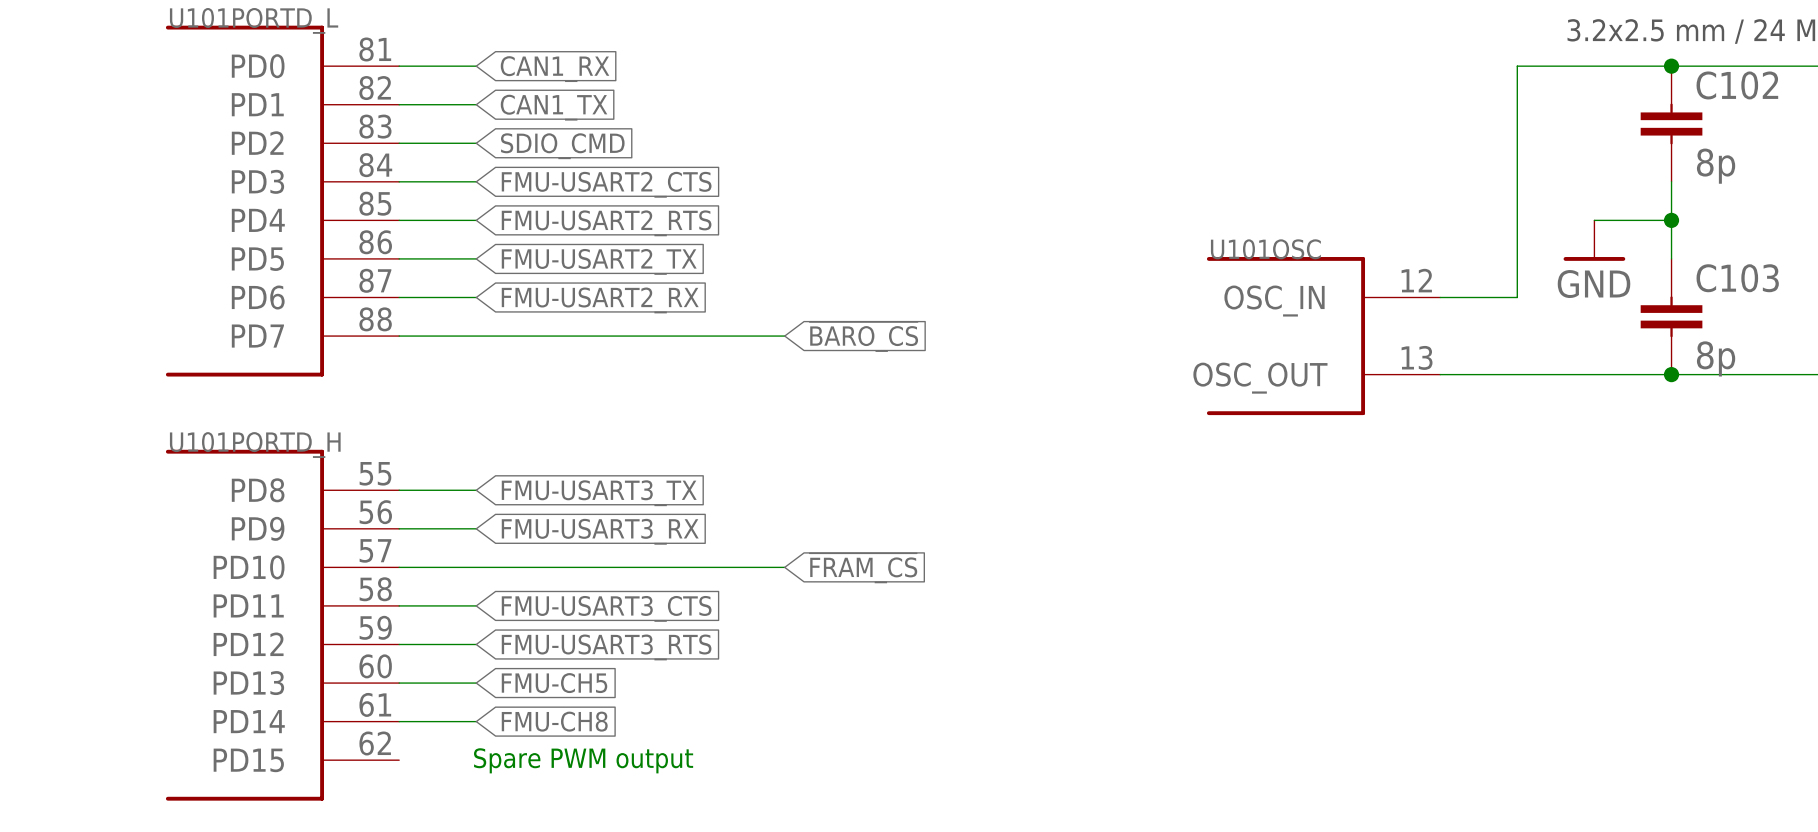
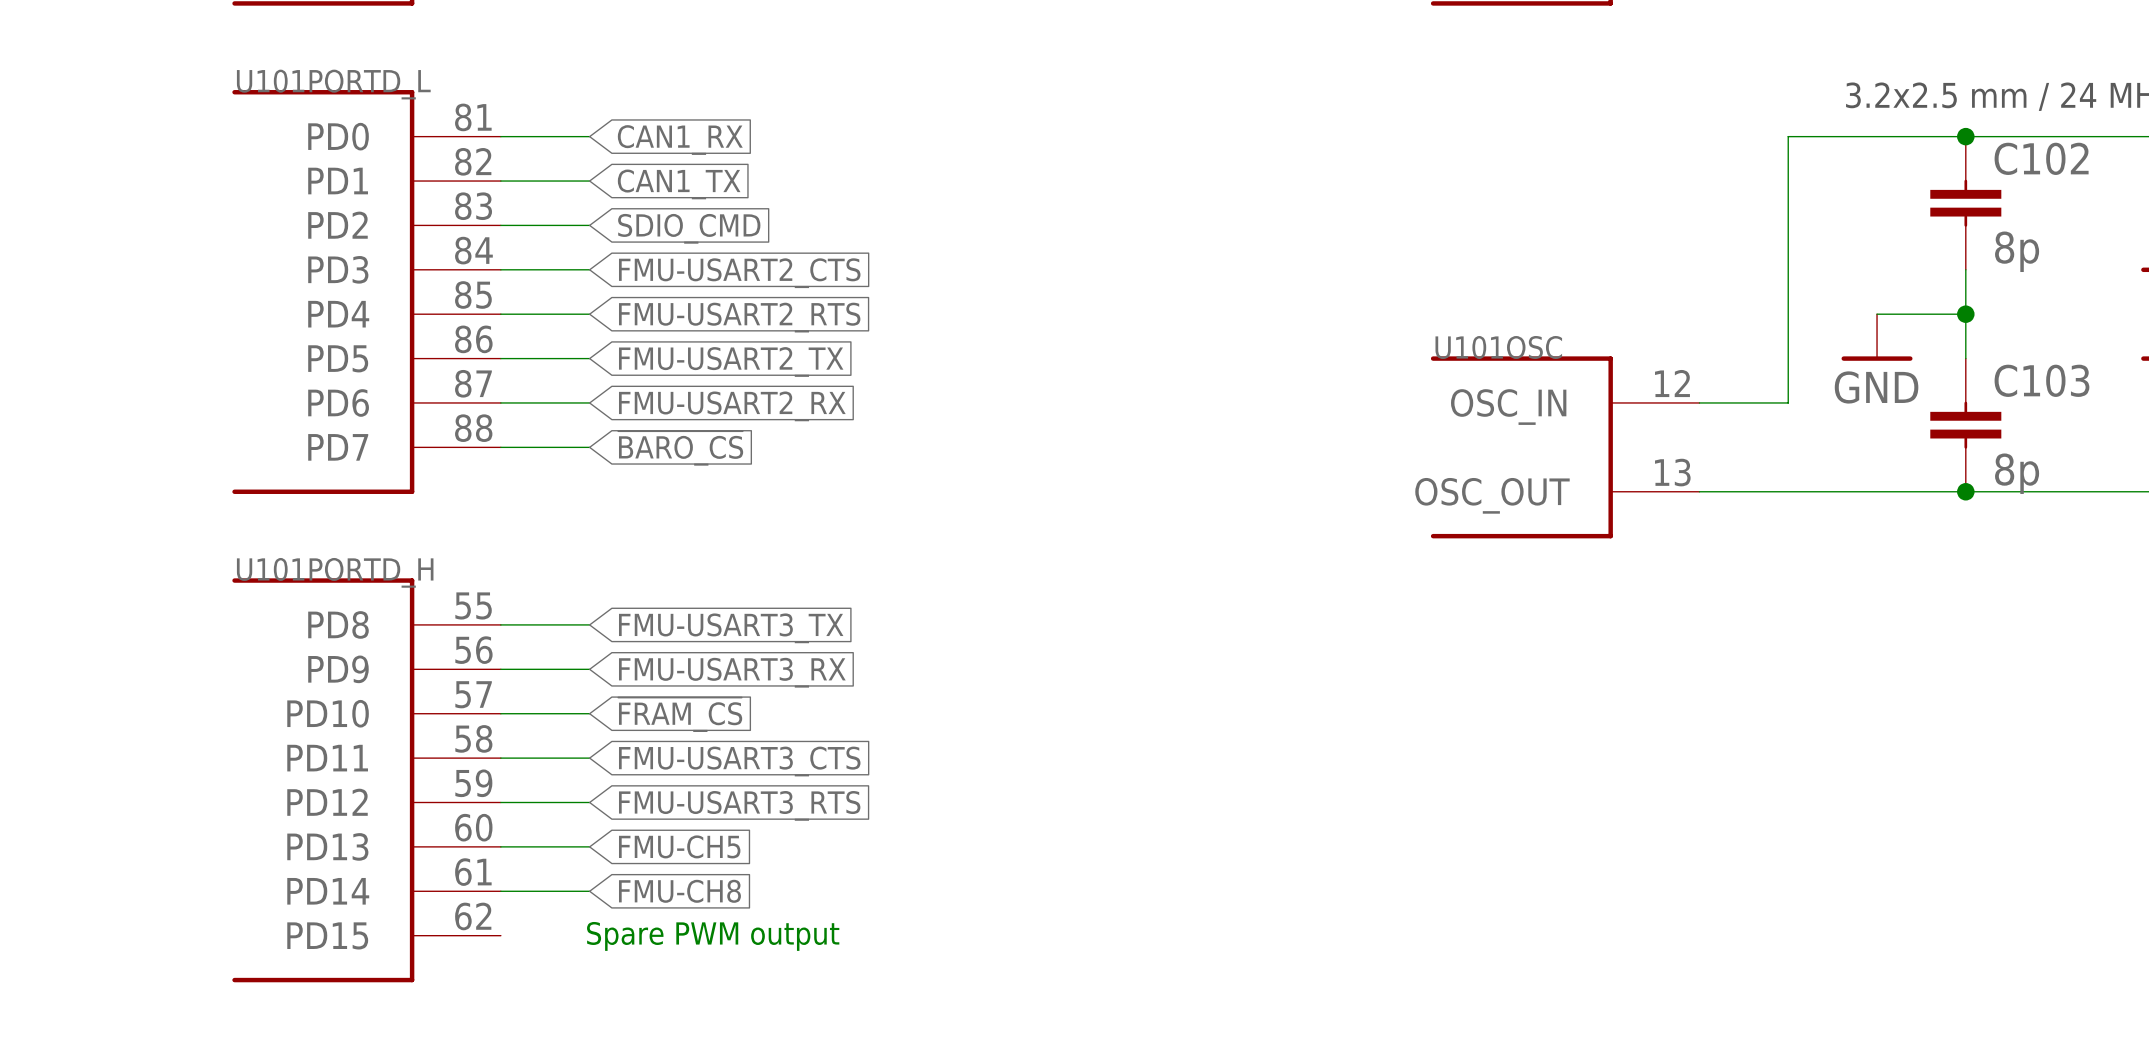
wire: (476, 336) (784, 336) -> none
global label position: ~{BARO_CS} (863, 336) -> ~{BARO_CS} (680, 448)
wire: (476, 567) (784, 567) -> none
global label position: ~{FRAM_CS} (863, 568) -> ~{FRAM_CS} (680, 714)

